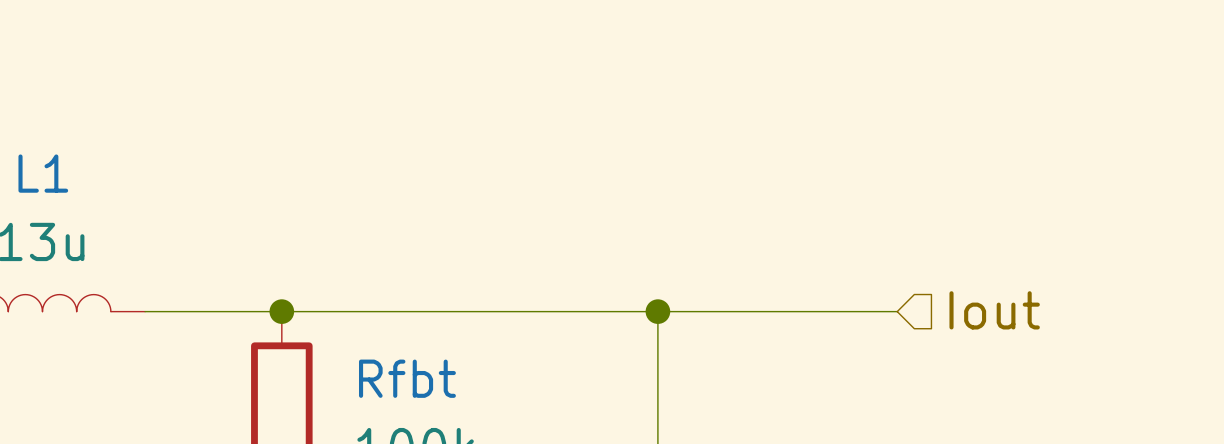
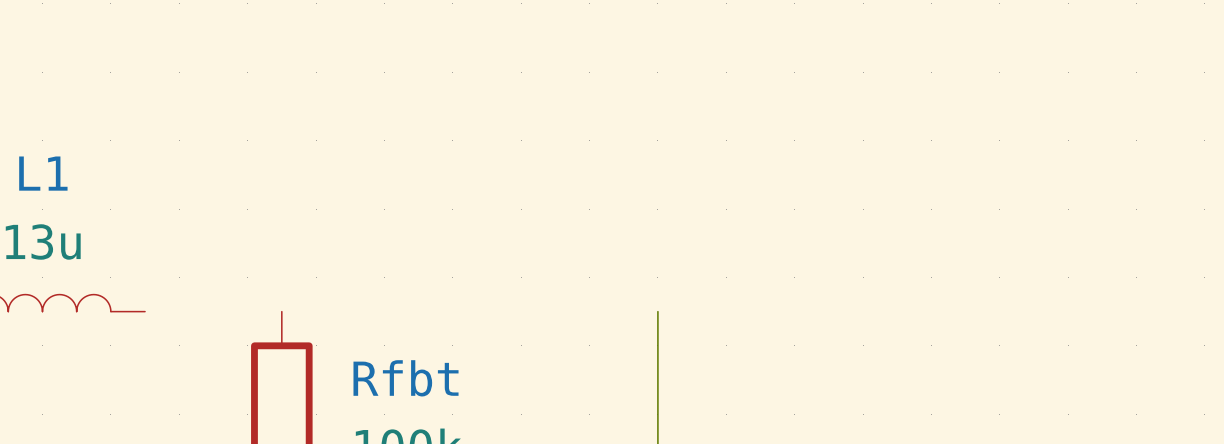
hierarchical label: Iout (994, 310) -> none
wire: (145, 311) (897, 311) -> none
junction: (281, 311) -> none
junction: (657, 311) -> none

